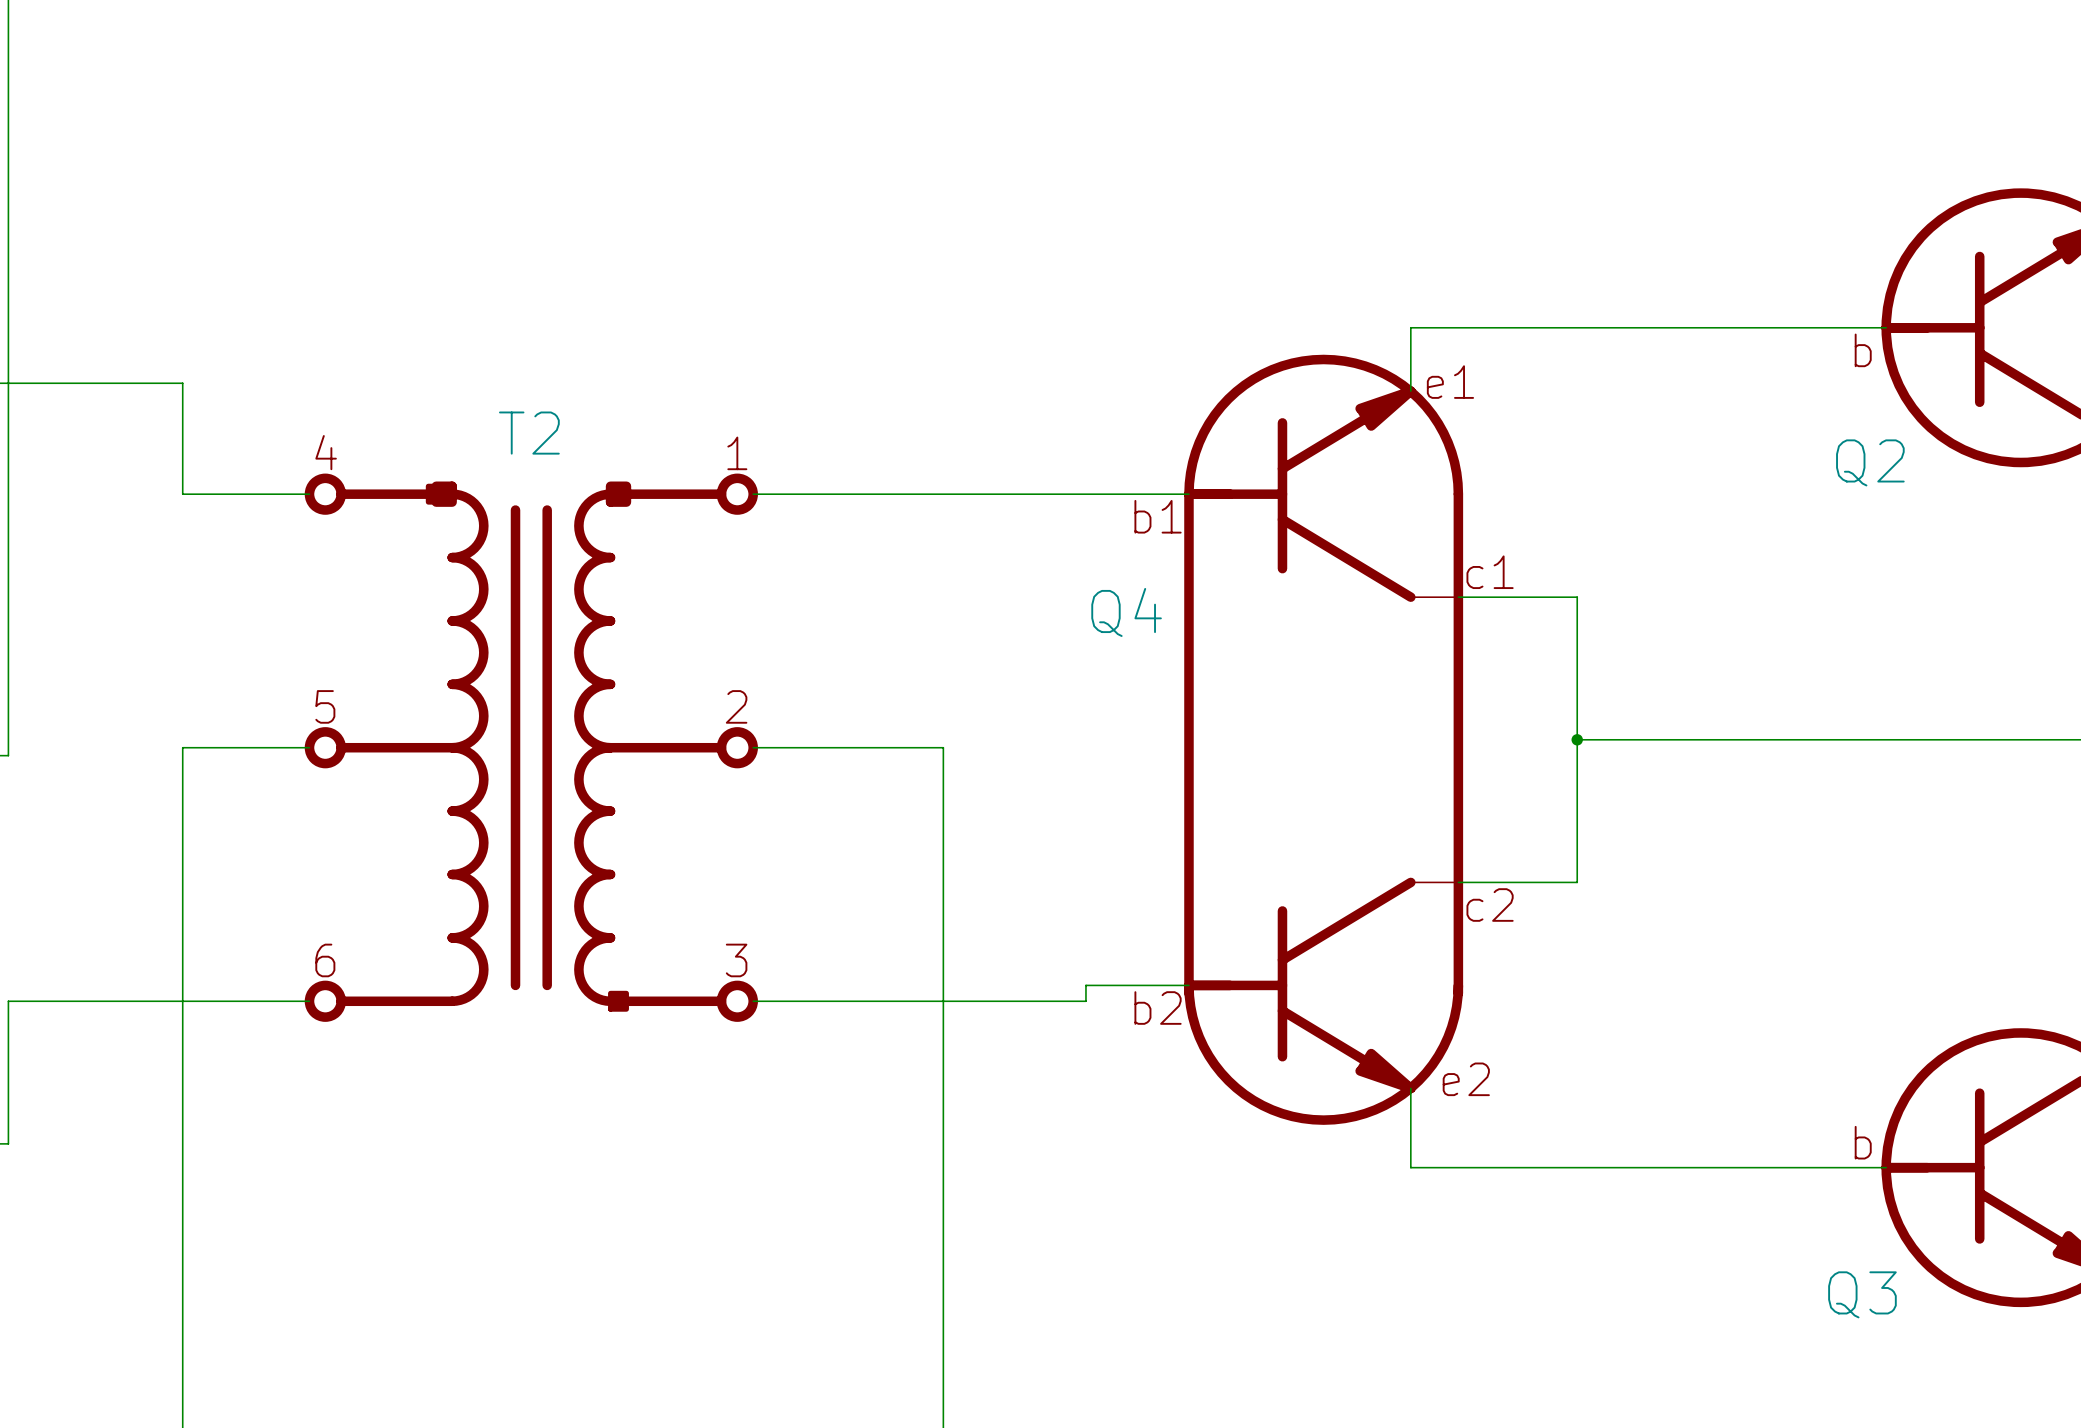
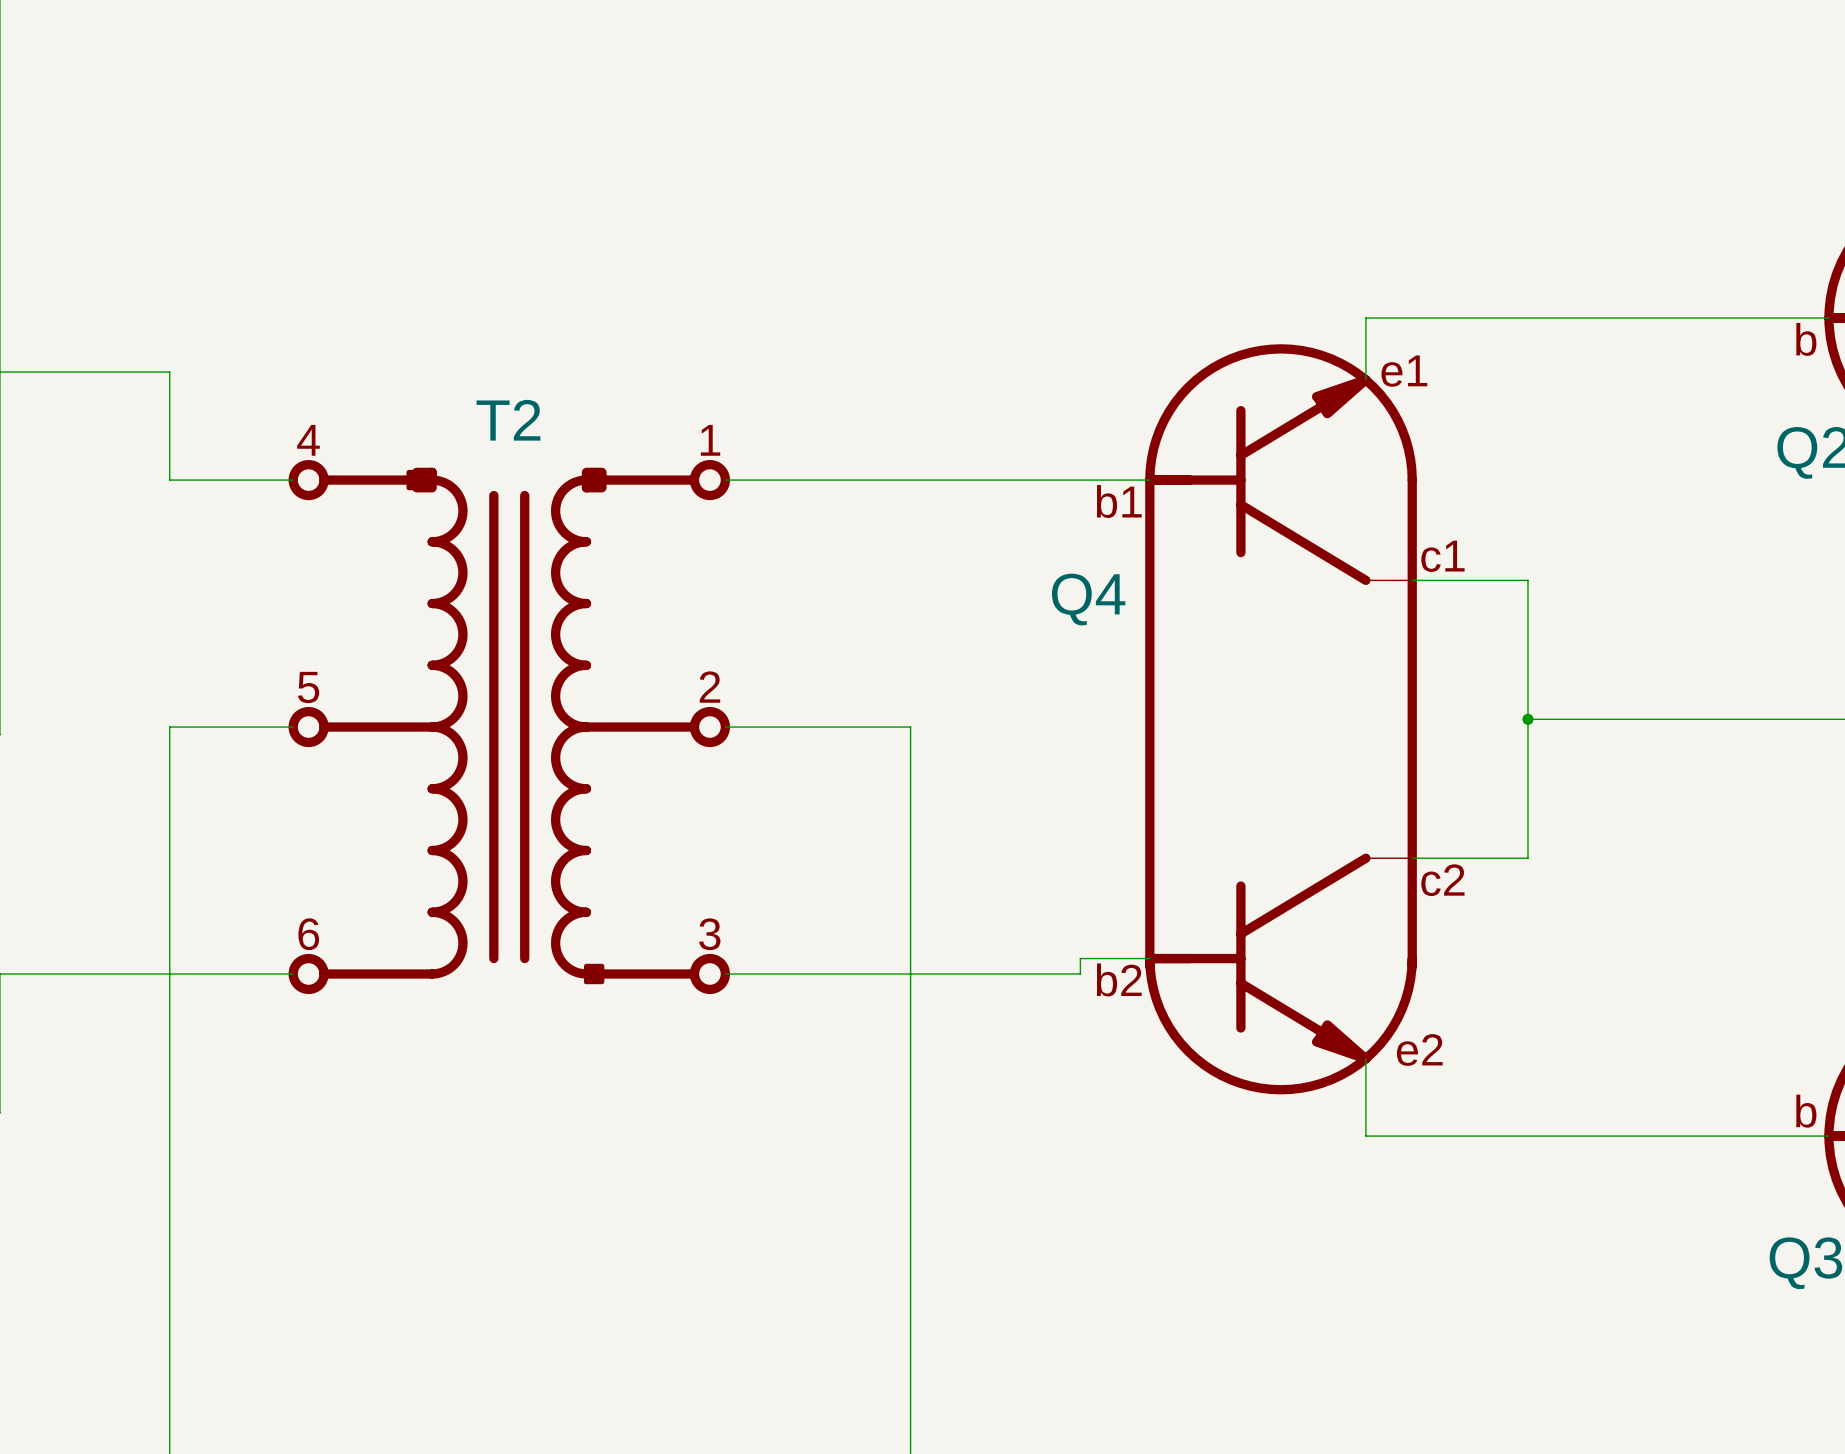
wire: (1117, 985) (1085, 985) (1085, 1001) -> (1080, 958) (1080, 973) (1049, 973)

